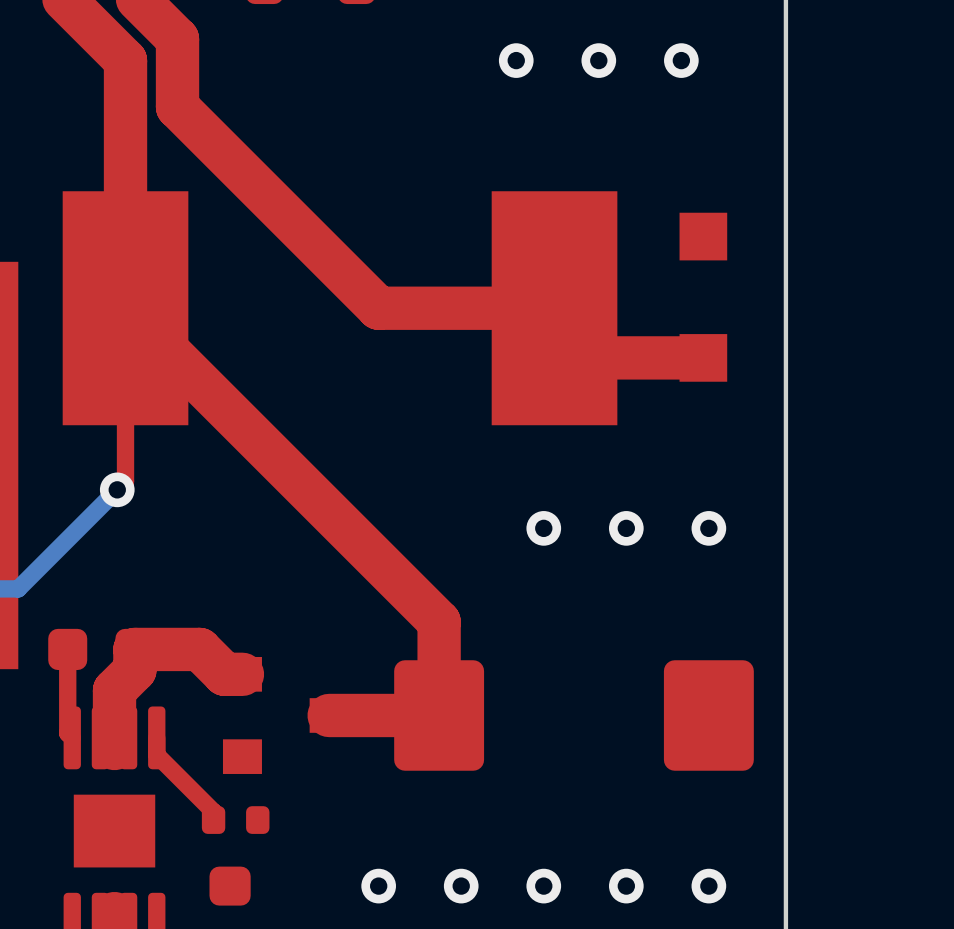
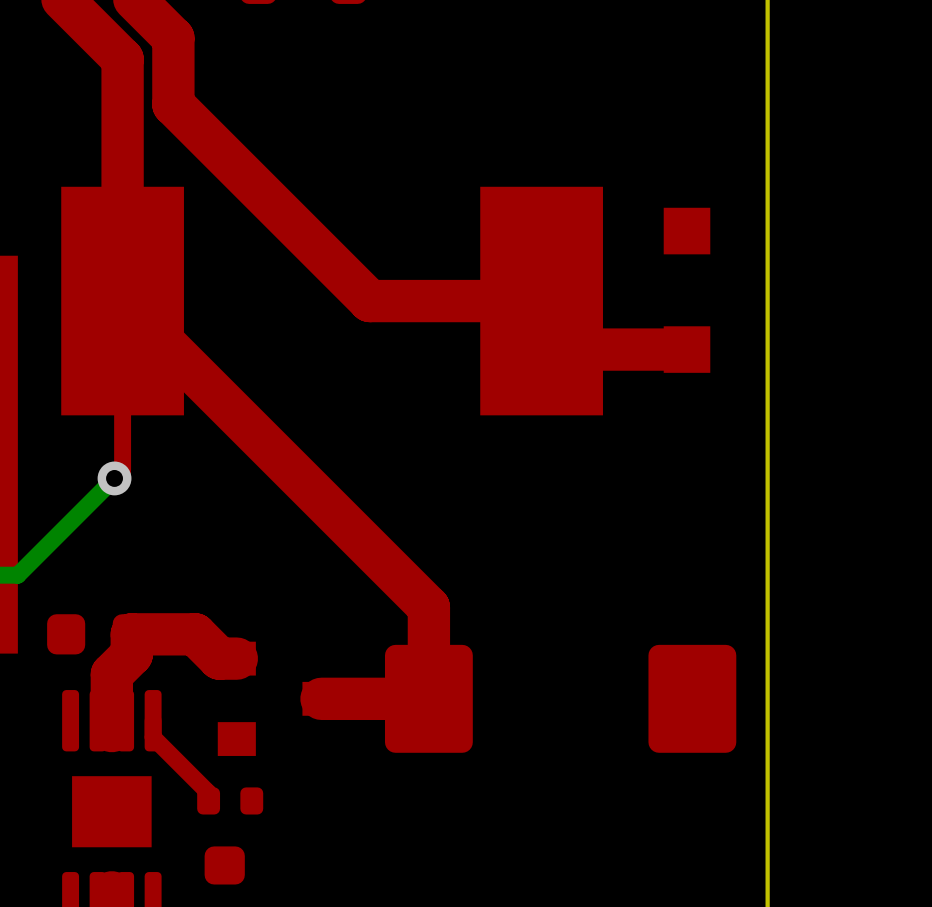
via: (516, 60) -> none
via: (598, 60) -> none
via: (681, 60) -> none
via: (543, 528) -> none
via: (626, 528) -> none
via: (708, 528) -> none
top track: (67, 649) (67, 733) (72, 737) -> none
via: (378, 886) -> none
via: (461, 886) -> none
via: (543, 886) -> none
via: (626, 886) -> none
via: (708, 886) -> none

